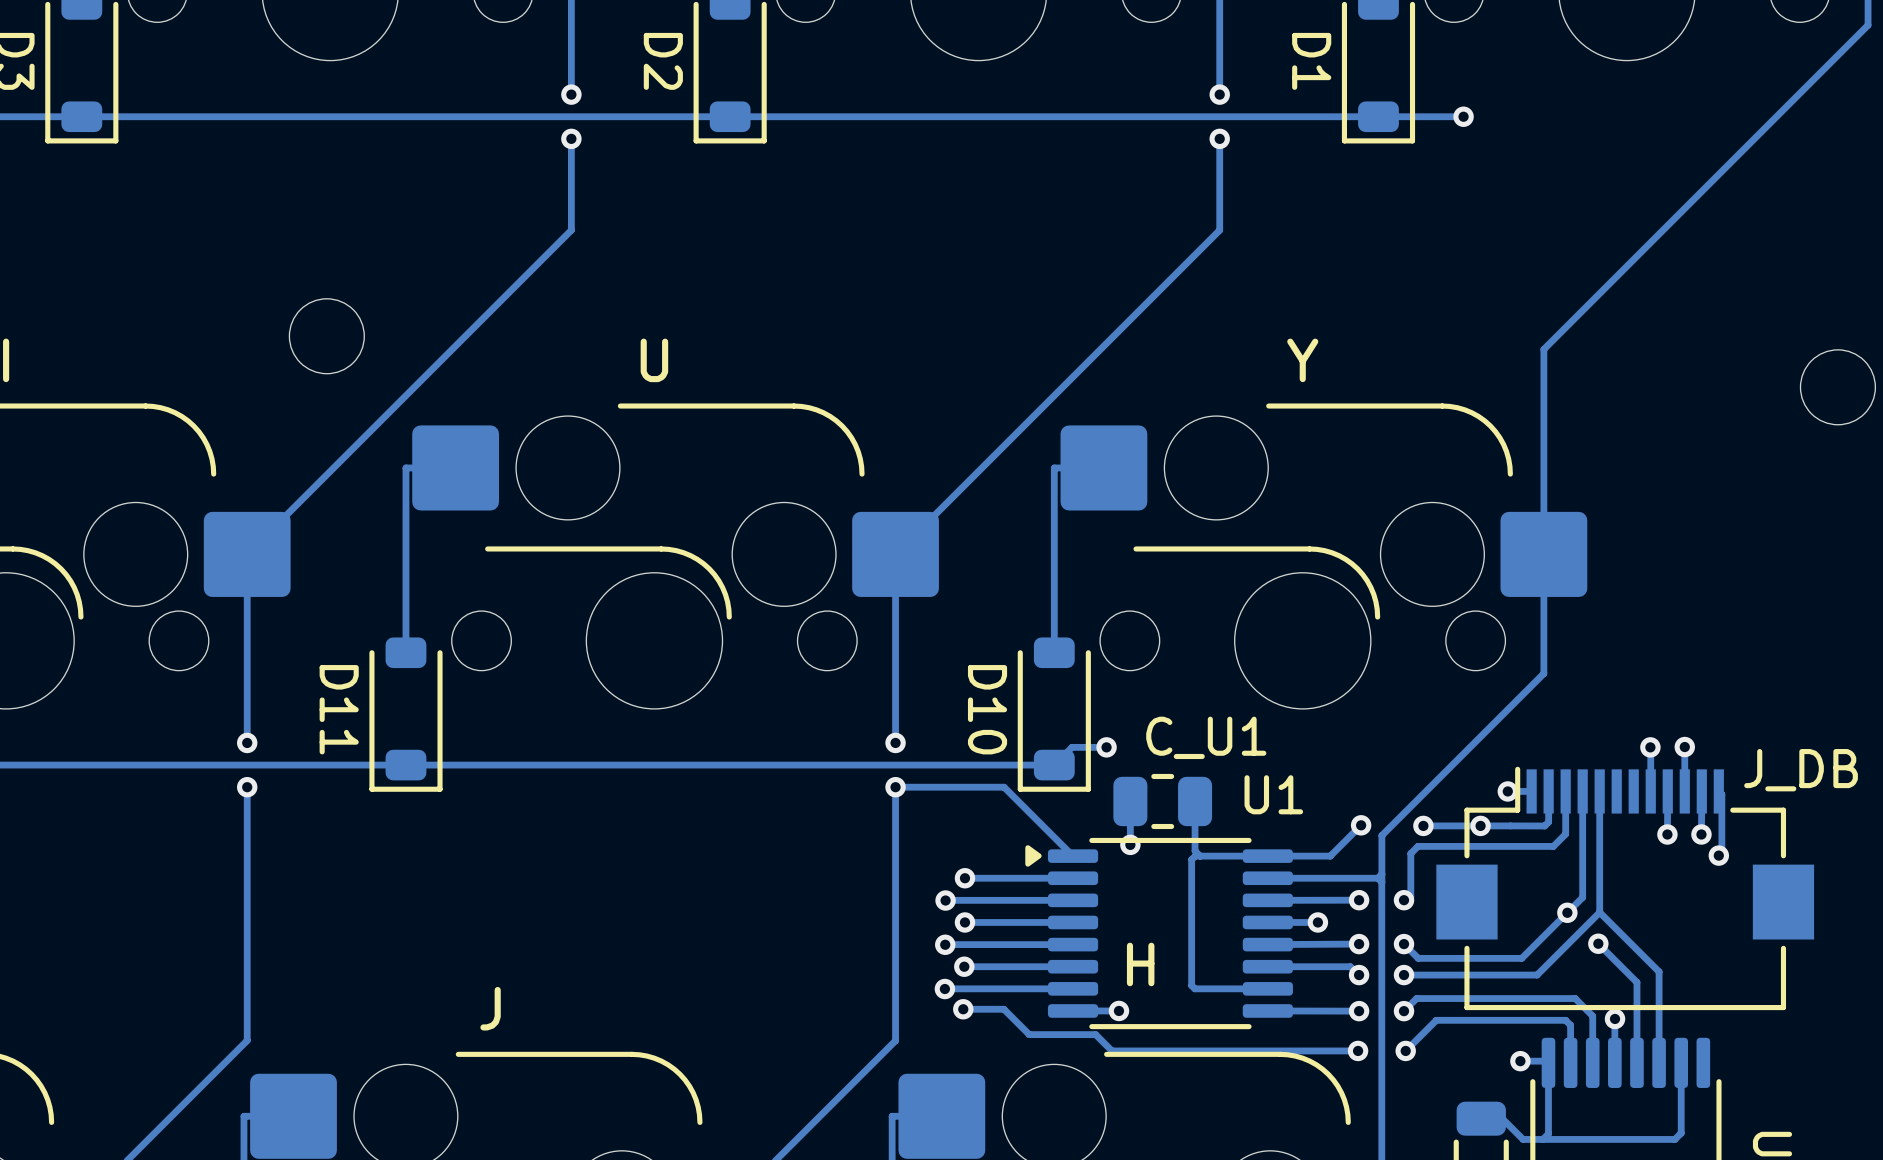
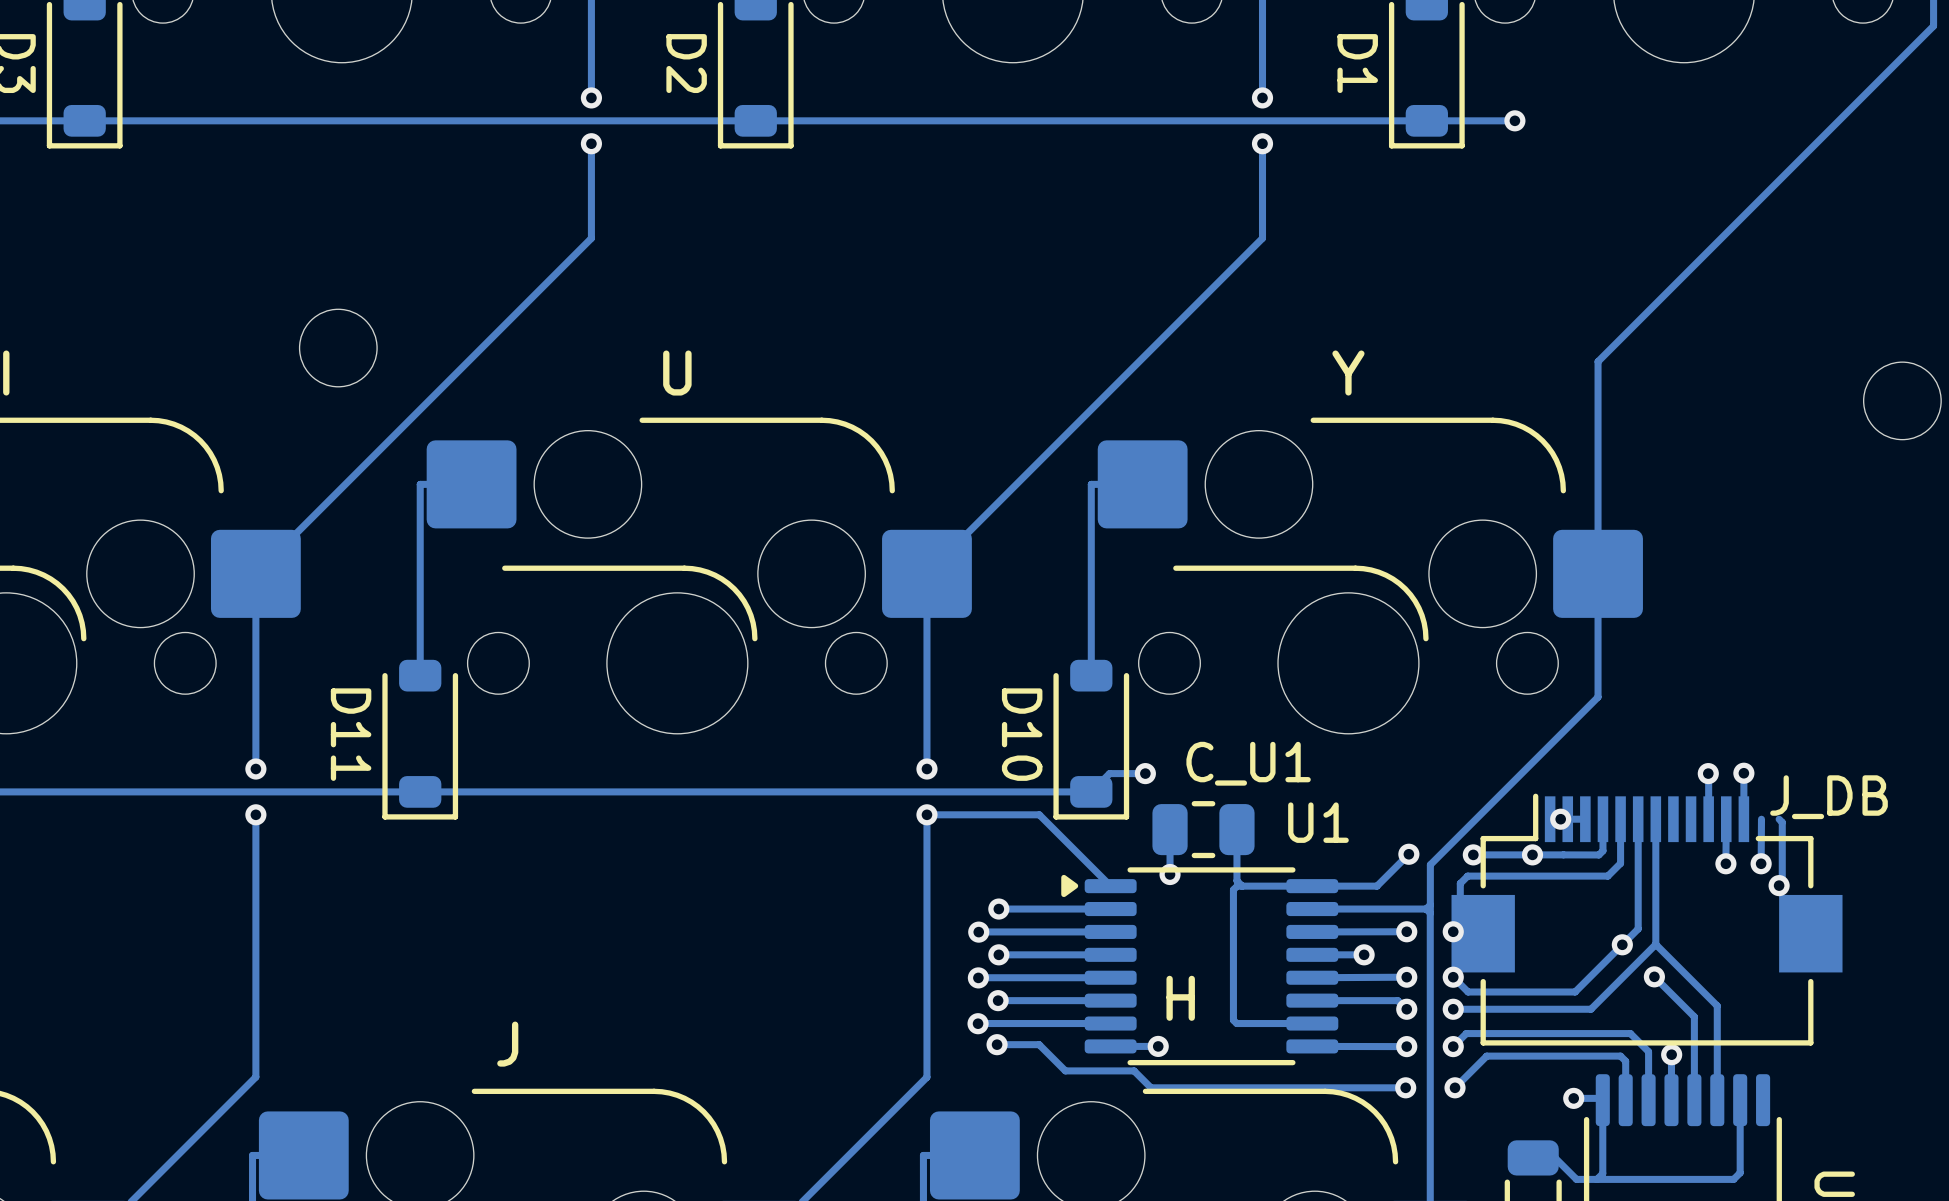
J_DB position: (1625, 888) -> (1647, 919)

